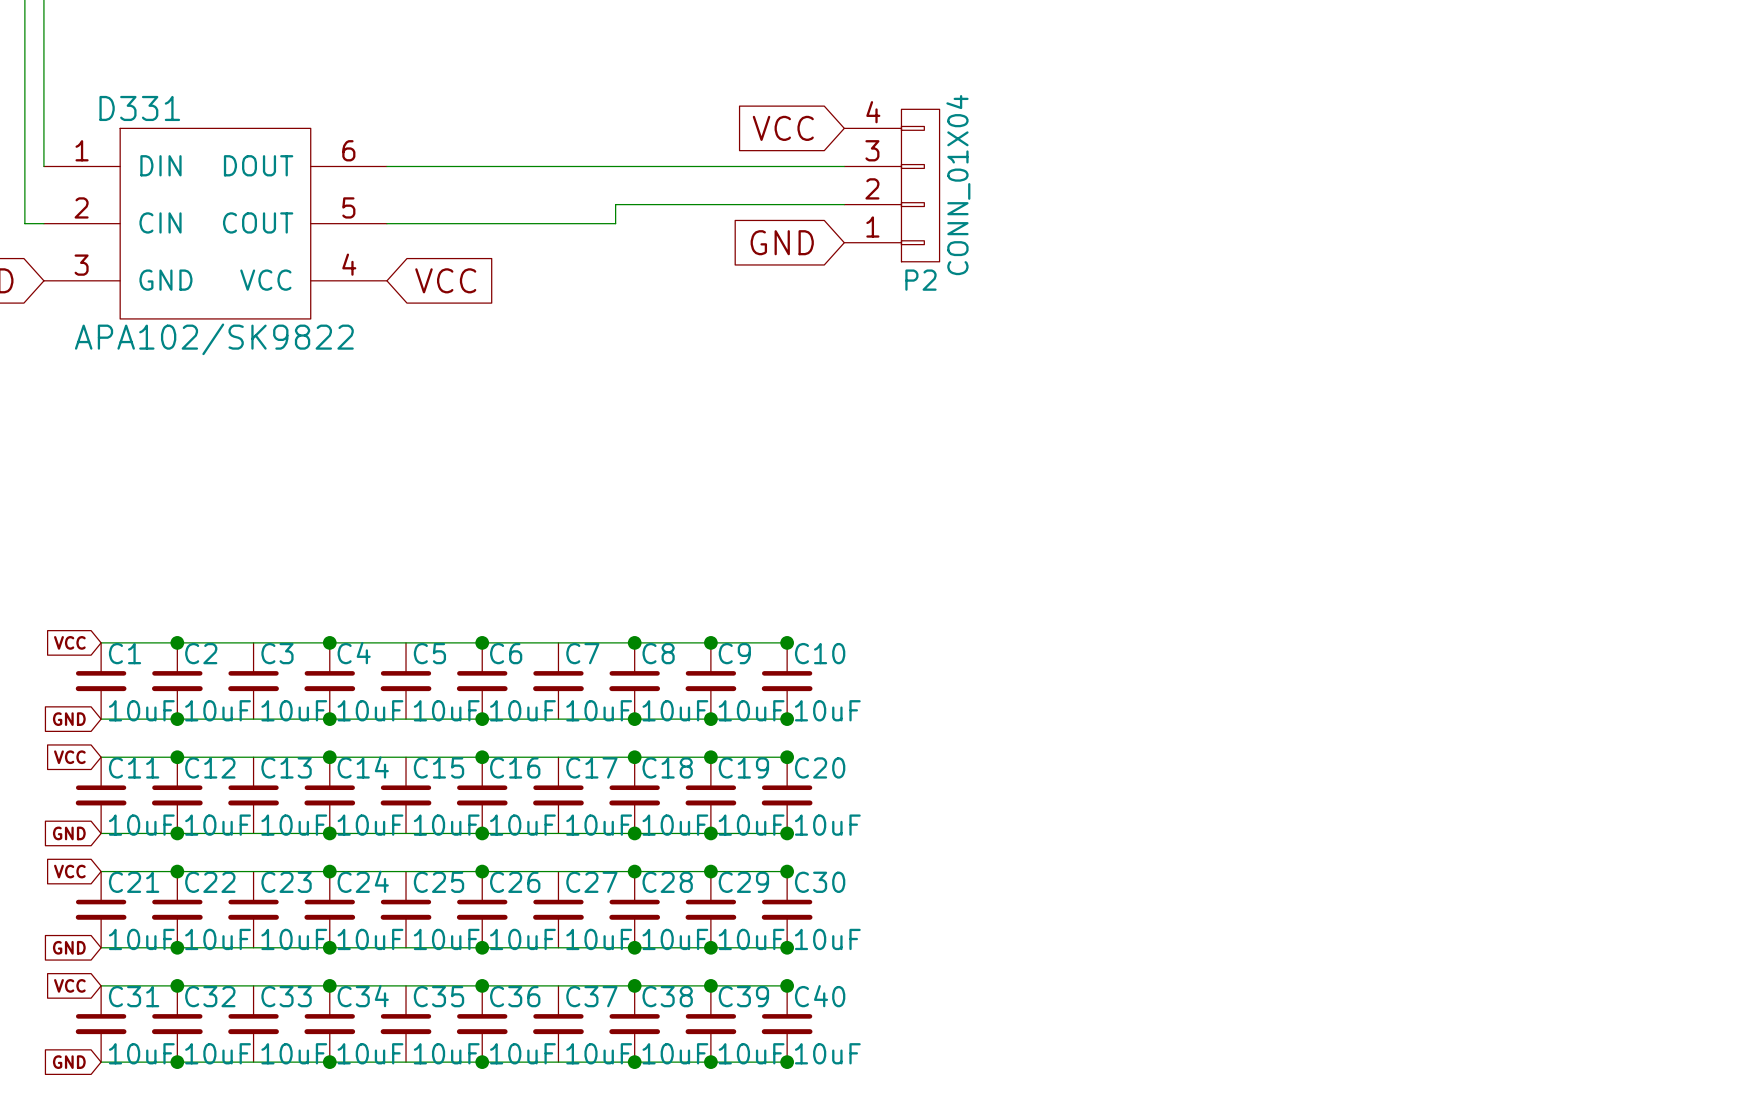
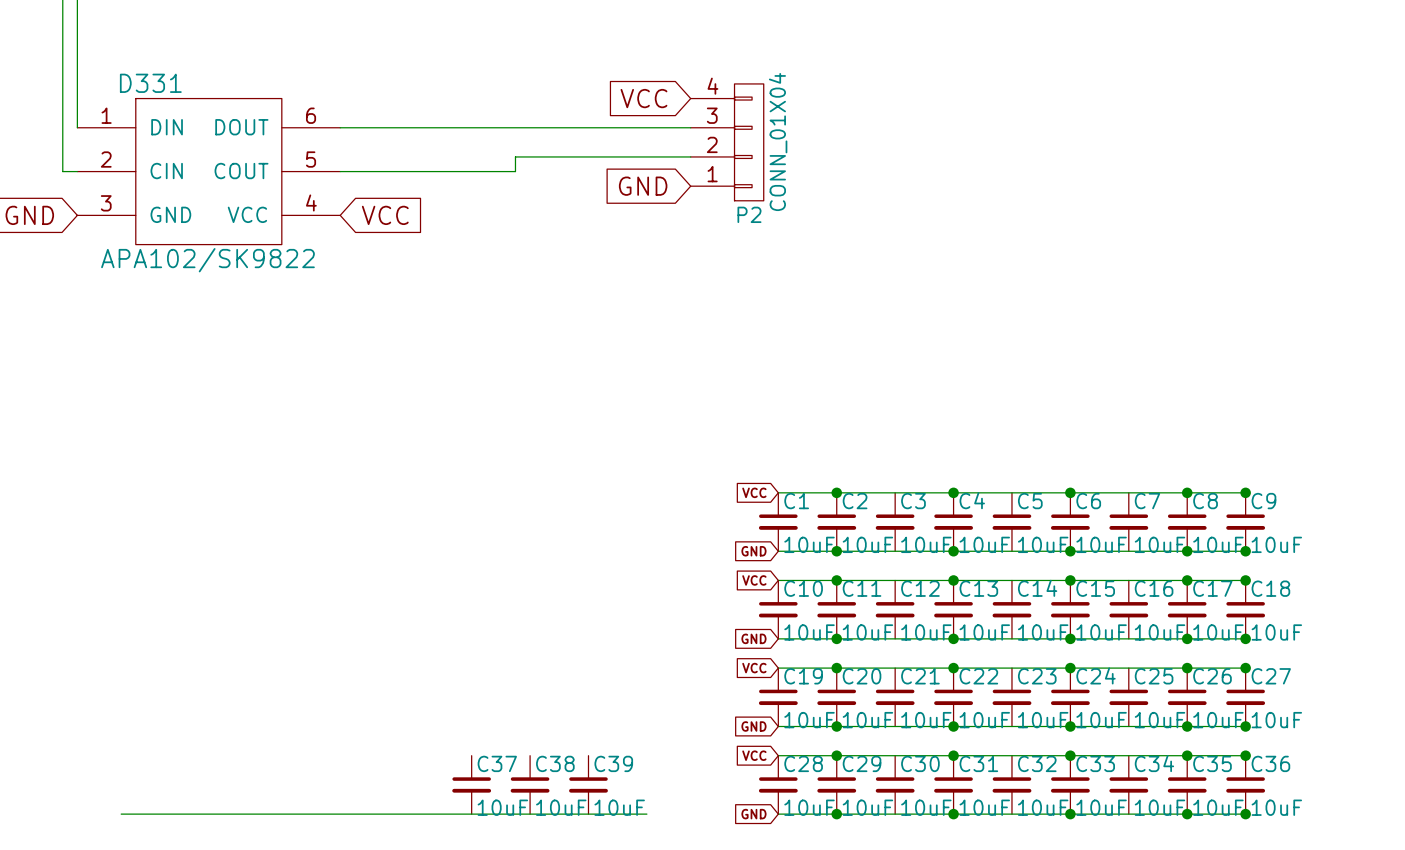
global label: VCC (69, 642) -> none
wire: (101, 642) (787, 642) -> none
junction: (177, 642) -> none
junction: (329, 642) -> none
junction: (482, 642) -> none
junction: (634, 642) -> none
junction: (710, 642) -> none
junction: (787, 642) -> none
global label: none -> VCC (754, 492)
wire: none -> (778, 492) (1245, 492)
junction: none -> (836, 492)
junction: none -> (953, 492)
junction: none -> (1070, 492)
junction: none -> (1187, 492)
junction: none -> (1245, 492)
C1 position: (101, 681) -> (778, 522)
C2 position: (177, 681) -> (836, 522)
C3 position: (253, 681) -> (895, 522)
C4 position: (329, 681) -> (953, 522)
C5 position: (406, 681) -> (1011, 522)
C6 position: (482, 681) -> (1070, 522)
C7 position: (558, 681) -> (1128, 522)
C8 position: (634, 681) -> (1187, 522)
C9 position: (710, 681) -> (1245, 522)
C10 position: (787, 681) -> (778, 609)
global label: GND (69, 719) -> none
wire: (101, 719) (787, 719) -> none
junction: (177, 719) -> none
junction: (329, 719) -> none
junction: (482, 719) -> none
junction: (634, 719) -> none
junction: (710, 719) -> none
junction: (787, 719) -> none
global label: none -> GND (753, 551)
wire: none -> (778, 551) (1245, 551)
junction: none -> (836, 551)
junction: none -> (953, 551)
junction: none -> (1070, 551)
junction: none -> (1187, 551)
junction: none -> (1245, 551)
global label: VCC (69, 757) -> none
wire: (101, 757) (787, 757) -> none
junction: (177, 757) -> none
junction: (329, 757) -> none
junction: (482, 757) -> none
junction: (634, 757) -> none
junction: (710, 757) -> none
junction: (787, 757) -> none
global label: none -> VCC (754, 580)
wire: none -> (778, 580) (1245, 580)
junction: none -> (836, 580)
junction: none -> (953, 580)
junction: none -> (1070, 580)
junction: none -> (1187, 580)
junction: none -> (1245, 580)
C11 position: (101, 795) -> (836, 609)
C12 position: (177, 795) -> (895, 609)
C13 position: (253, 795) -> (953, 609)
C14 position: (329, 795) -> (1011, 609)
C15 position: (406, 795) -> (1070, 609)
C16 position: (482, 795) -> (1128, 609)
C17 position: (558, 795) -> (1187, 609)
C18 position: (634, 795) -> (1245, 609)
C19 position: (710, 795) -> (778, 697)
C20 position: (787, 795) -> (836, 697)
global label: GND (69, 833) -> none
wire: (101, 833) (787, 833) -> none
junction: (177, 833) -> none
junction: (329, 833) -> none
junction: (482, 833) -> none
junction: (634, 833) -> none
junction: (710, 833) -> none
junction: (787, 833) -> none
global label: none -> GND (753, 638)
wire: none -> (778, 638) (1245, 638)
junction: none -> (836, 638)
junction: none -> (953, 638)
junction: none -> (1070, 638)
junction: none -> (1187, 638)
junction: none -> (1245, 638)
global label: VCC (69, 871) -> none
wire: (101, 871) (787, 871) -> none
junction: (177, 871) -> none
junction: (329, 871) -> none
junction: (482, 871) -> none
junction: (634, 871) -> none
junction: (710, 871) -> none
junction: (787, 871) -> none
global label: none -> VCC (754, 668)
wire: none -> (778, 668) (1245, 668)
junction: none -> (836, 668)
junction: none -> (953, 668)
junction: none -> (1070, 668)
junction: none -> (1187, 668)
junction: none -> (1245, 668)
C21 position: (101, 909) -> (895, 697)
C22 position: (177, 909) -> (953, 697)
C23 position: (253, 909) -> (1011, 697)
C24 position: (329, 909) -> (1070, 697)
C25 position: (406, 909) -> (1128, 697)
C26 position: (482, 909) -> (1187, 697)
C27 position: (558, 909) -> (1245, 697)
C28 position: (634, 909) -> (778, 784)
C29 position: (710, 909) -> (836, 784)
C30 position: (787, 909) -> (895, 784)
global label: GND (69, 947) -> none
wire: (101, 947) (787, 947) -> none
junction: (177, 947) -> none
junction: (329, 947) -> none
junction: (482, 947) -> none
junction: (634, 947) -> none
junction: (710, 947) -> none
junction: (787, 947) -> none
global label: none -> GND (753, 726)
wire: none -> (778, 726) (1245, 726)
junction: none -> (836, 726)
junction: none -> (953, 726)
junction: none -> (1070, 726)
junction: none -> (1187, 726)
junction: none -> (1245, 726)
global label: VCC (69, 985) -> none
wire: (101, 985) (787, 985) -> none
junction: (177, 985) -> none
junction: (329, 985) -> none
junction: (482, 985) -> none
junction: (634, 985) -> none
junction: (710, 985) -> none
junction: (787, 985) -> none
global label: none -> VCC (754, 755)
wire: none -> (778, 755) (1245, 755)
junction: none -> (836, 755)
junction: none -> (953, 755)
junction: none -> (1070, 755)
junction: none -> (1187, 755)
junction: none -> (1245, 755)
C31 position: (101, 1024) -> (953, 784)
C32 position: (177, 1024) -> (1011, 784)
C33 position: (253, 1024) -> (1070, 784)
C34 position: (329, 1024) -> (1128, 784)
C35 position: (406, 1024) -> (1187, 784)
C36 position: (482, 1024) -> (1245, 784)
C40: 10uF (787, 1024) -> none
global label: GND (69, 1062) -> none
junction: (177, 1062) -> none
junction: (329, 1062) -> none
junction: (482, 1062) -> none
junction: (634, 1062) -> none
junction: (710, 1062) -> none
junction: (787, 1062) -> none
global label: none -> GND (753, 814)
wire: none -> (778, 814) (1245, 814)
junction: none -> (836, 814)
junction: none -> (953, 814)
junction: none -> (1070, 814)
junction: none -> (1187, 814)
junction: none -> (1245, 814)

